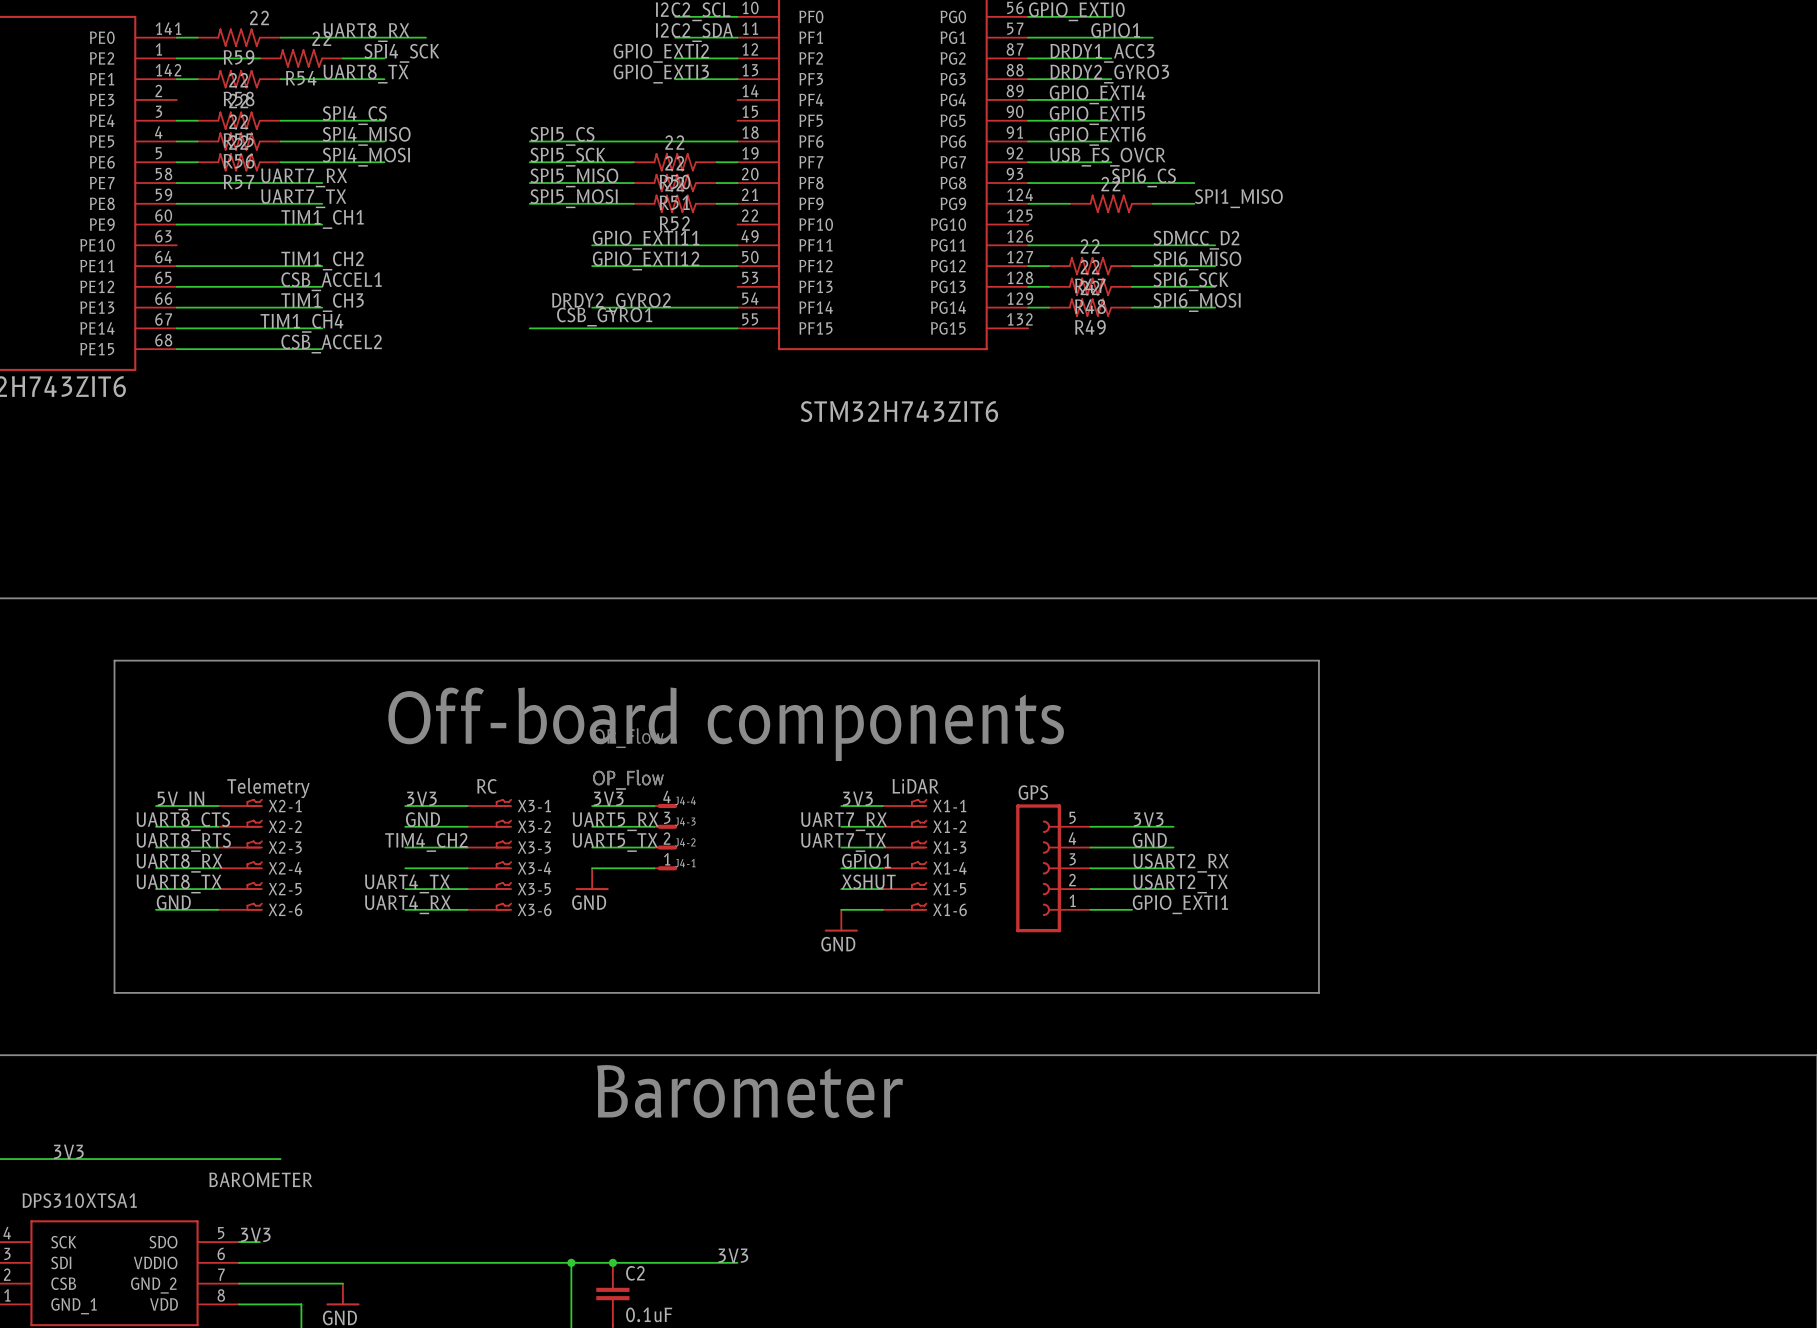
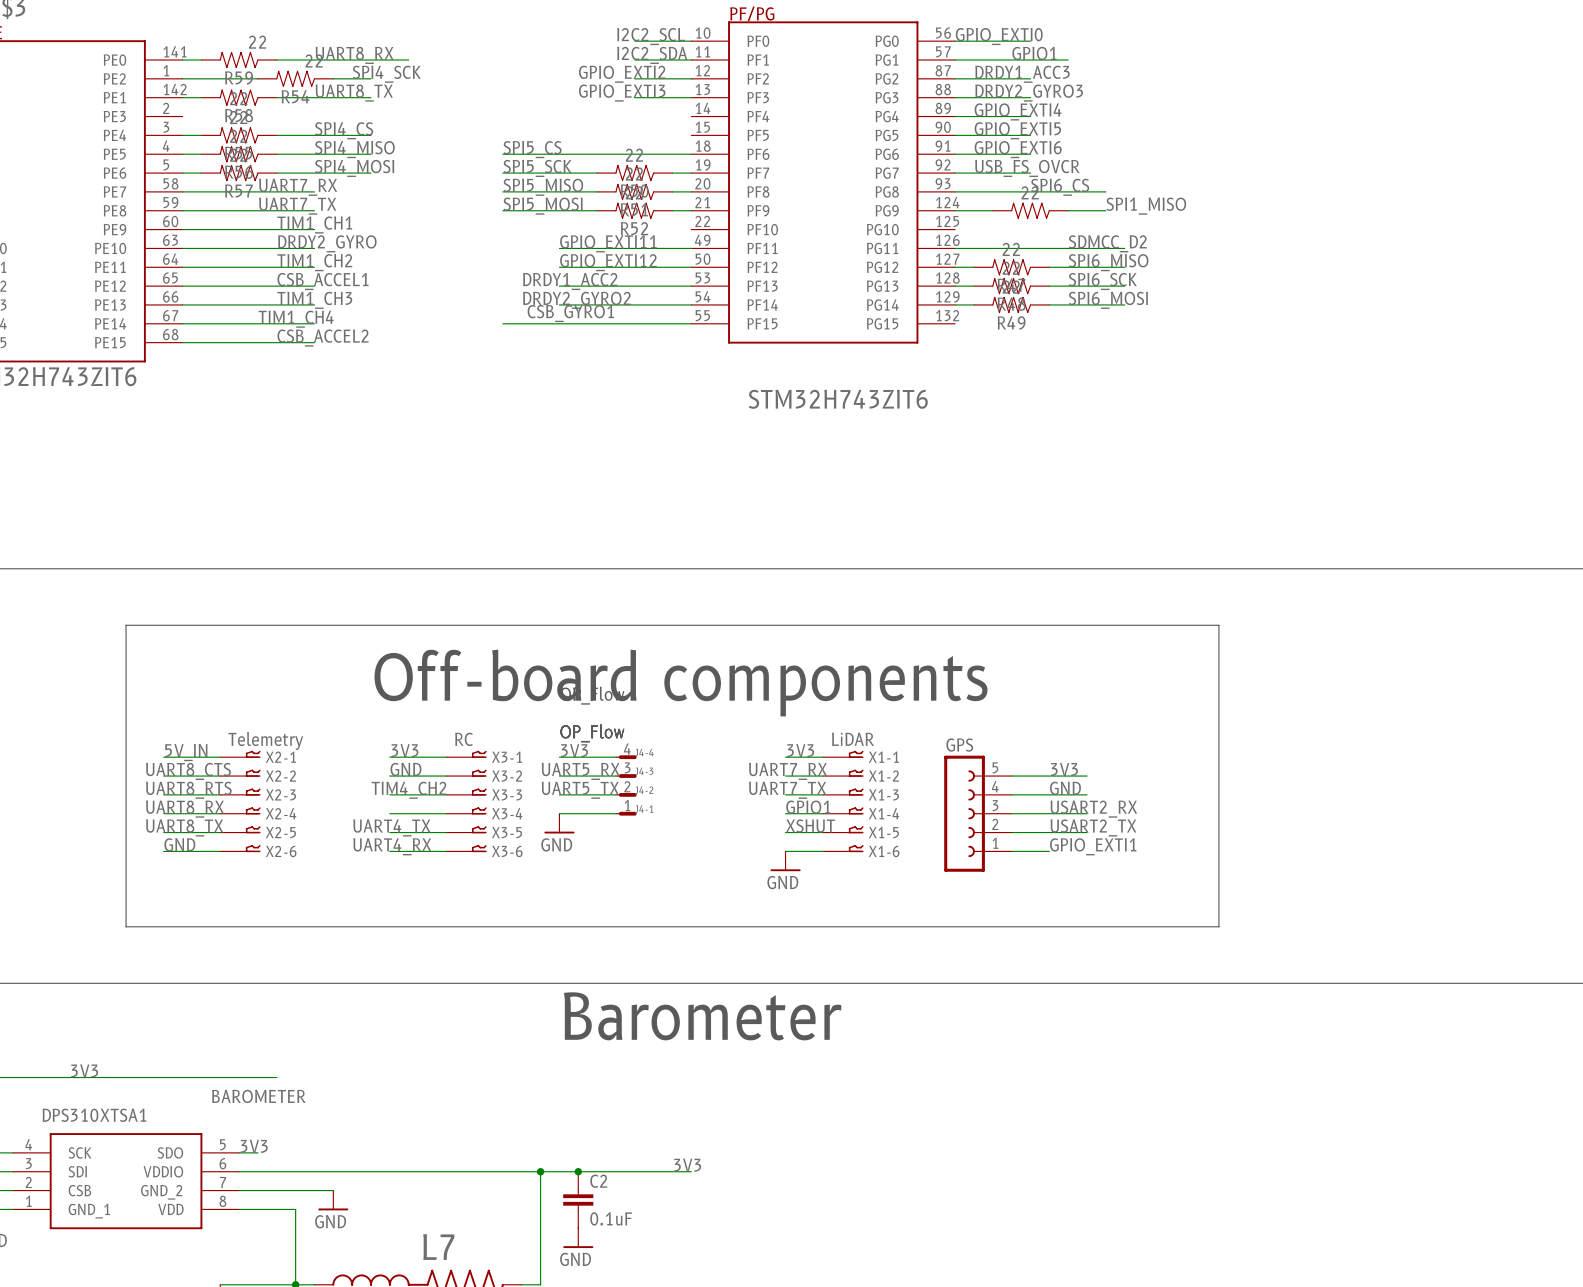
label: none -> DRDY2_GYRO (327, 243)
wire: none -> (182, 248) (314, 248)
label: none -> DRDY1_ACC2 (570, 281)
wire: none -> (559, 286) (691, 286)

